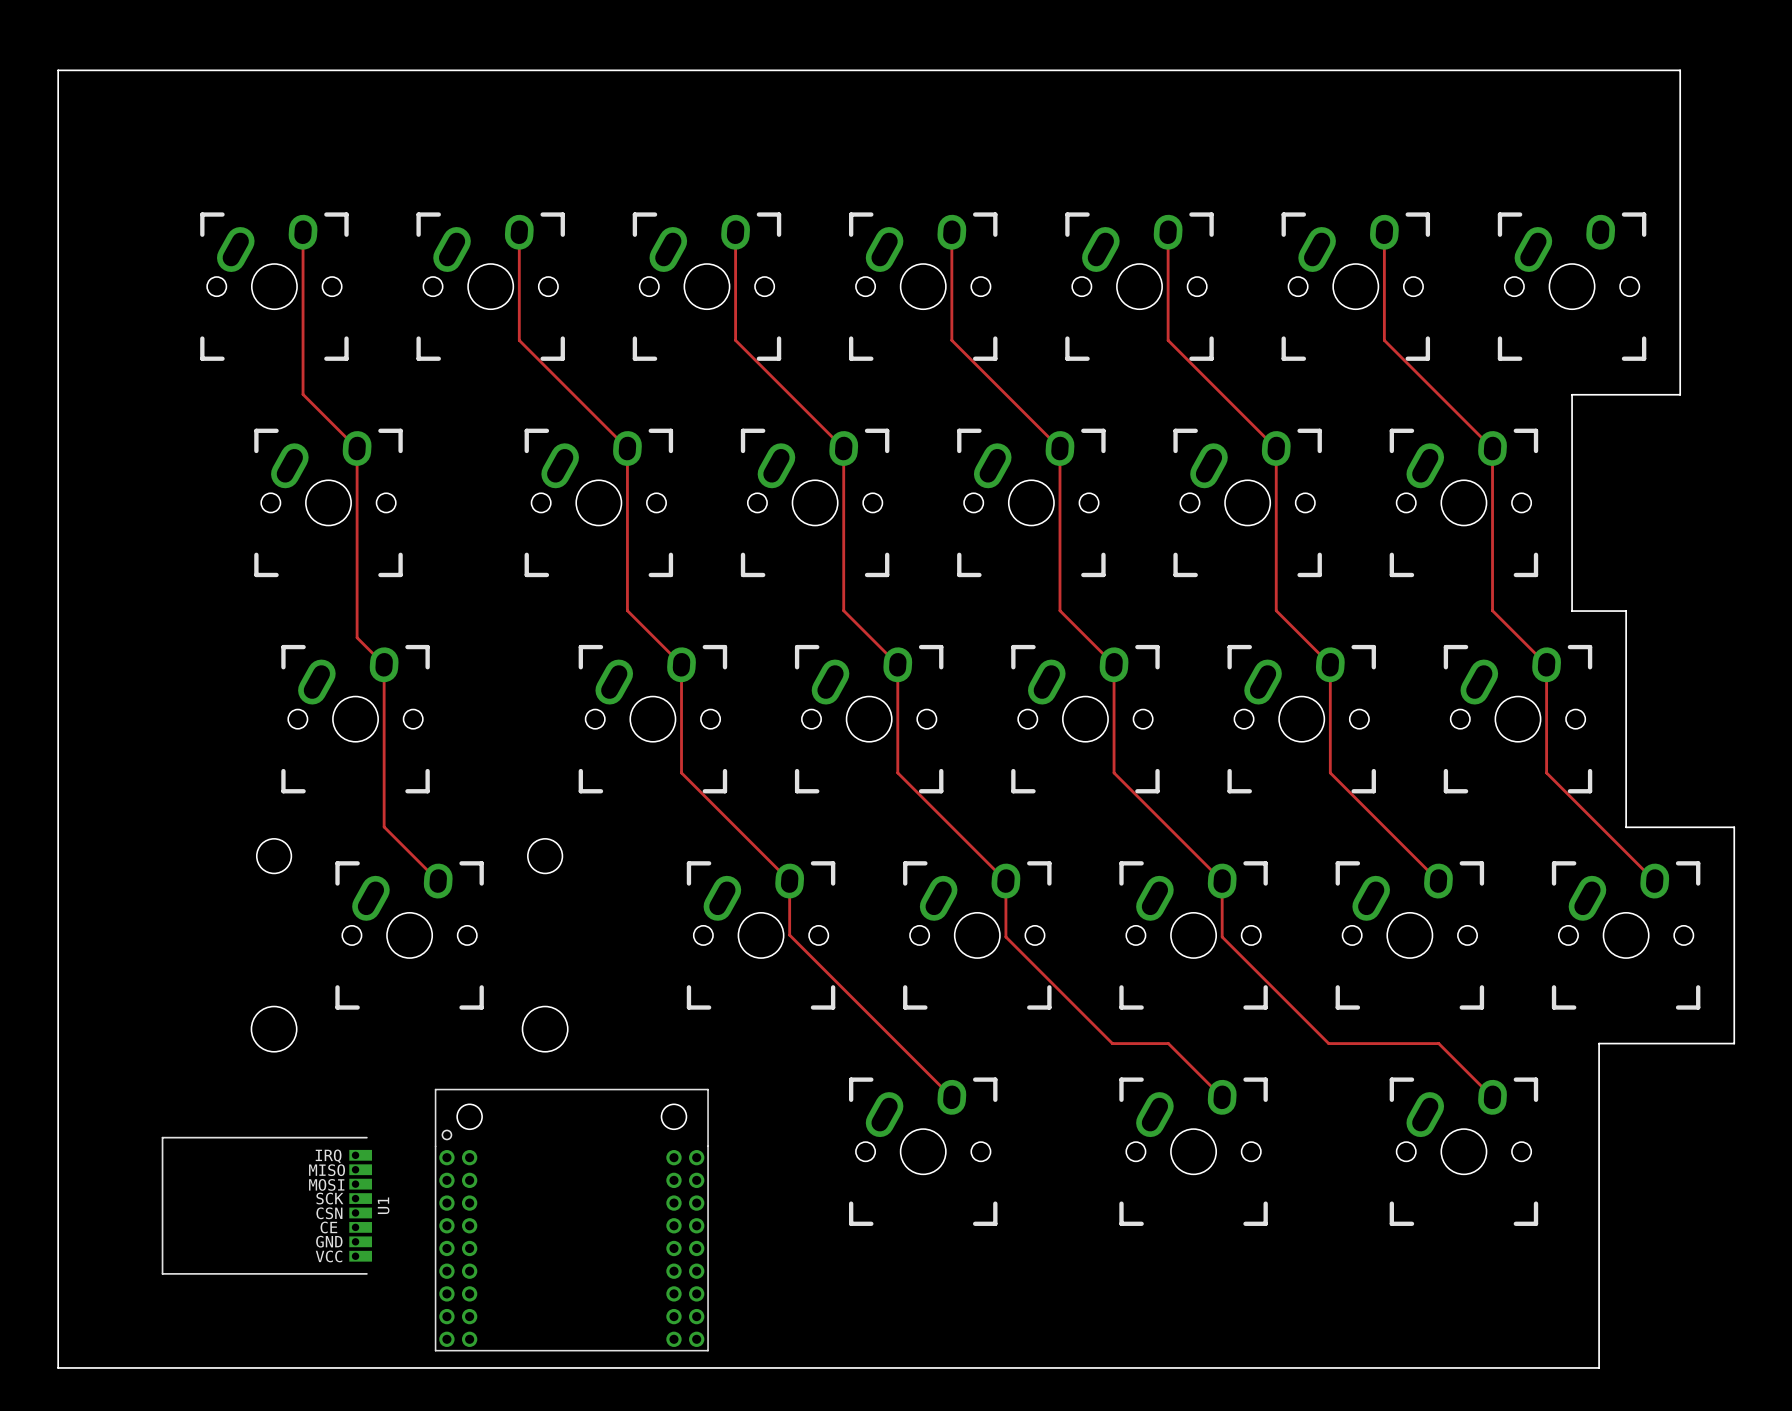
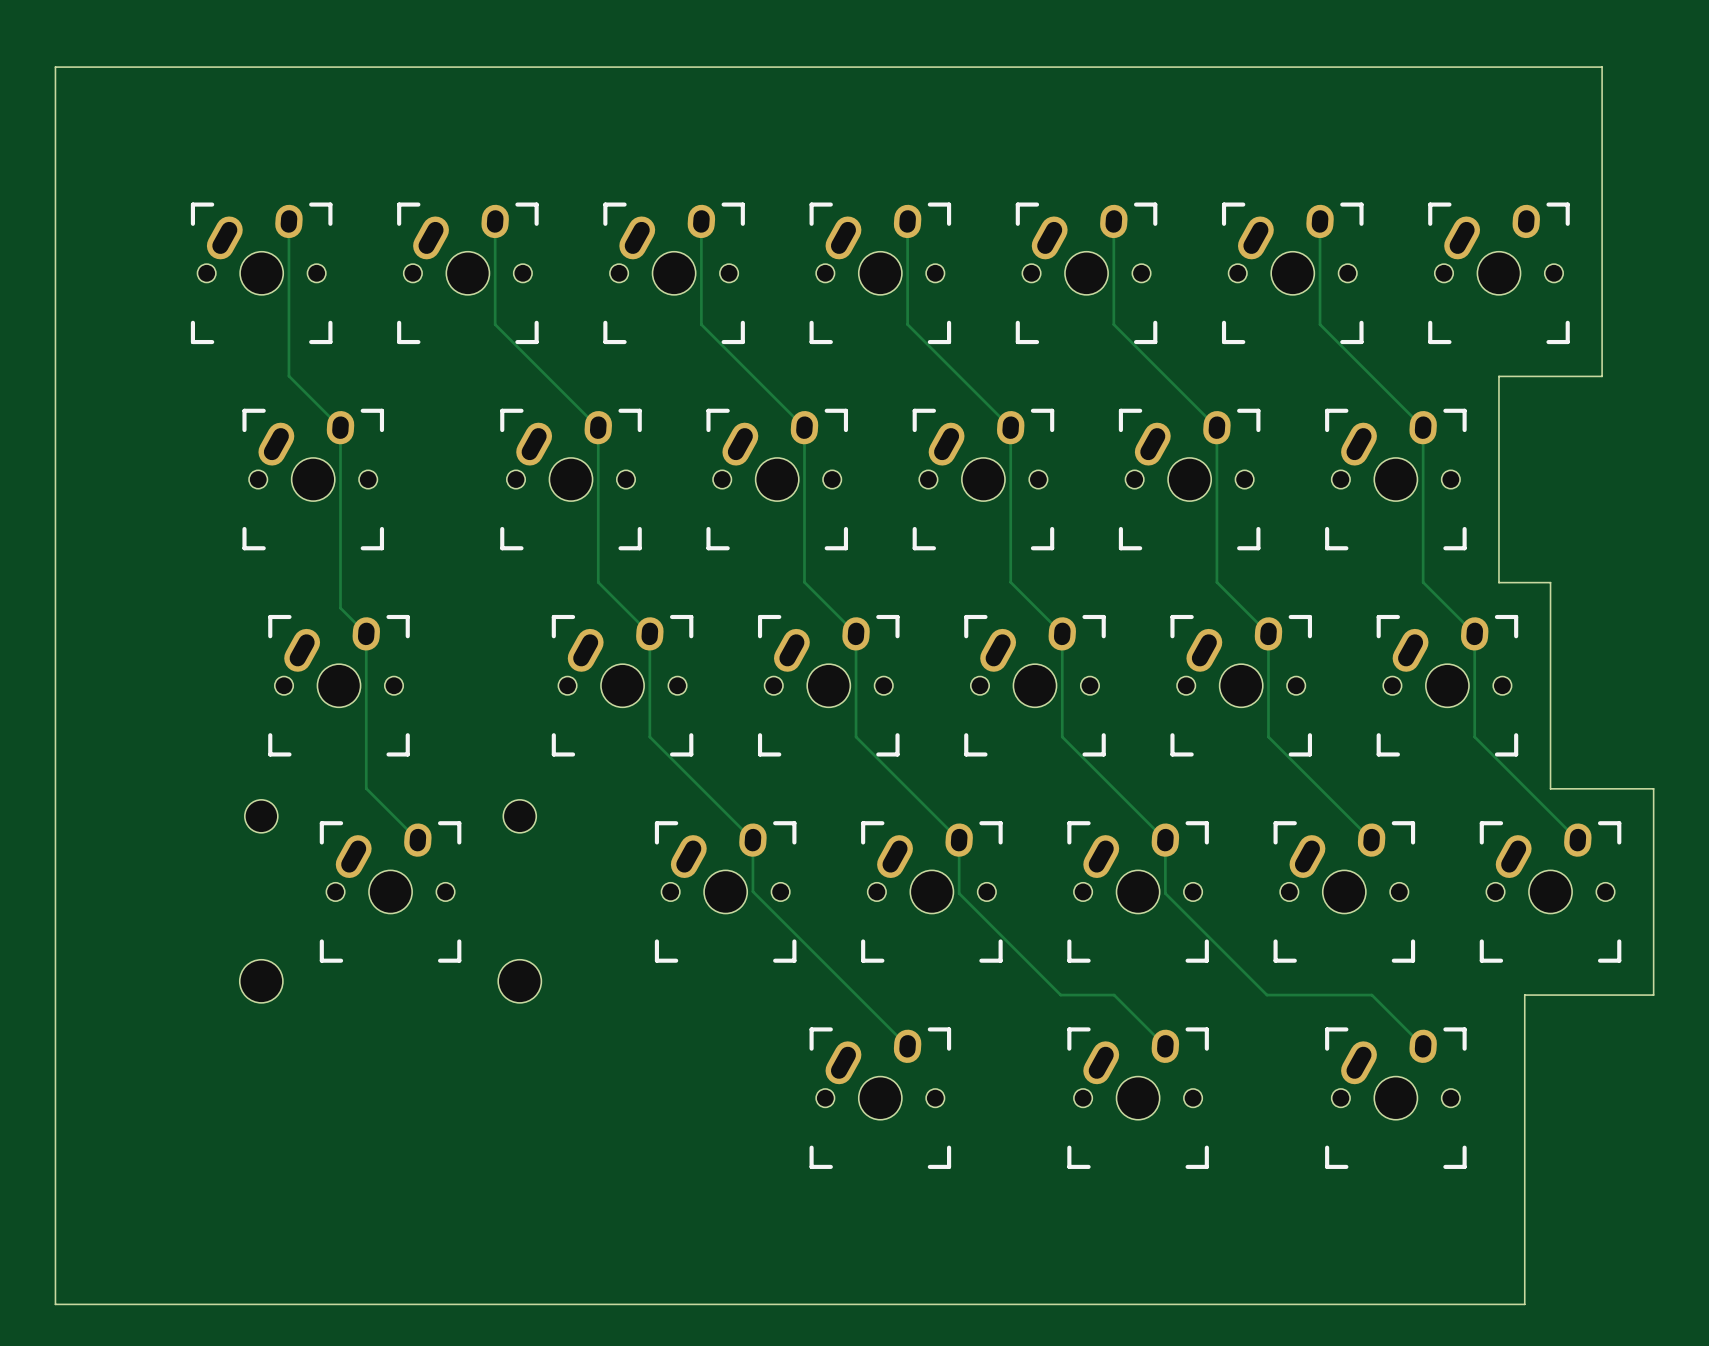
U1: (266, 1205) -> none
part: (571, 1220) -> none

